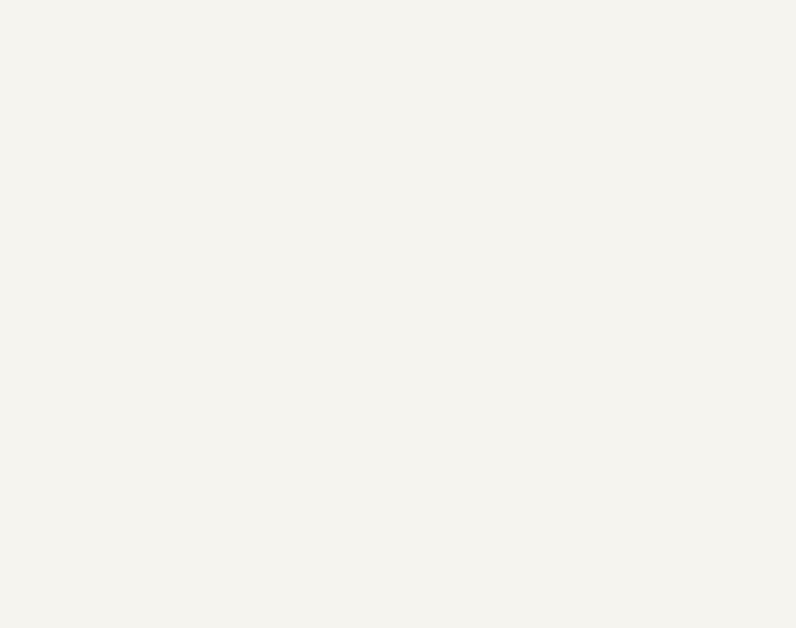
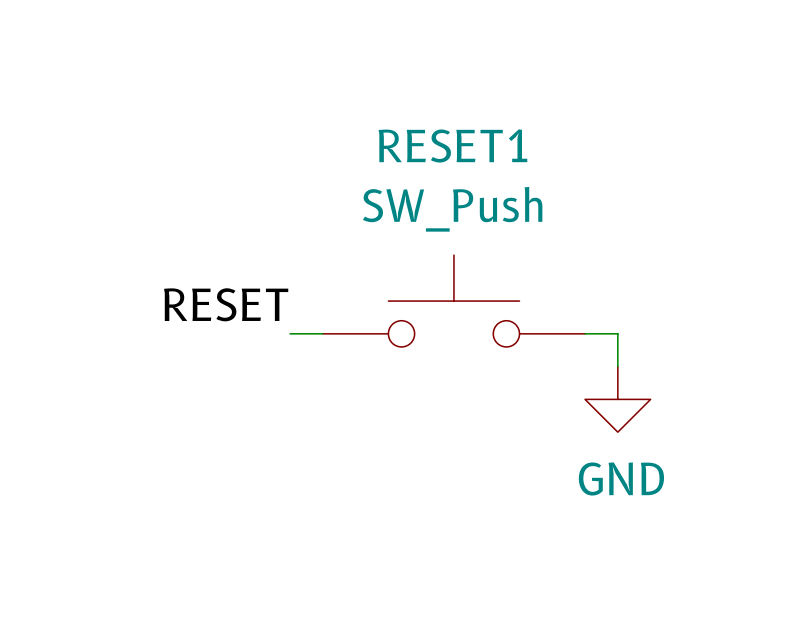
RESET1: none -> SW_Push (453, 301)
label: none -> RESET (226, 304)
wire: none -> (290, 333) (322, 333)
wire: none -> (585, 333) (617, 333) (617, 366)
power symbol: none -> GND (617, 399)

